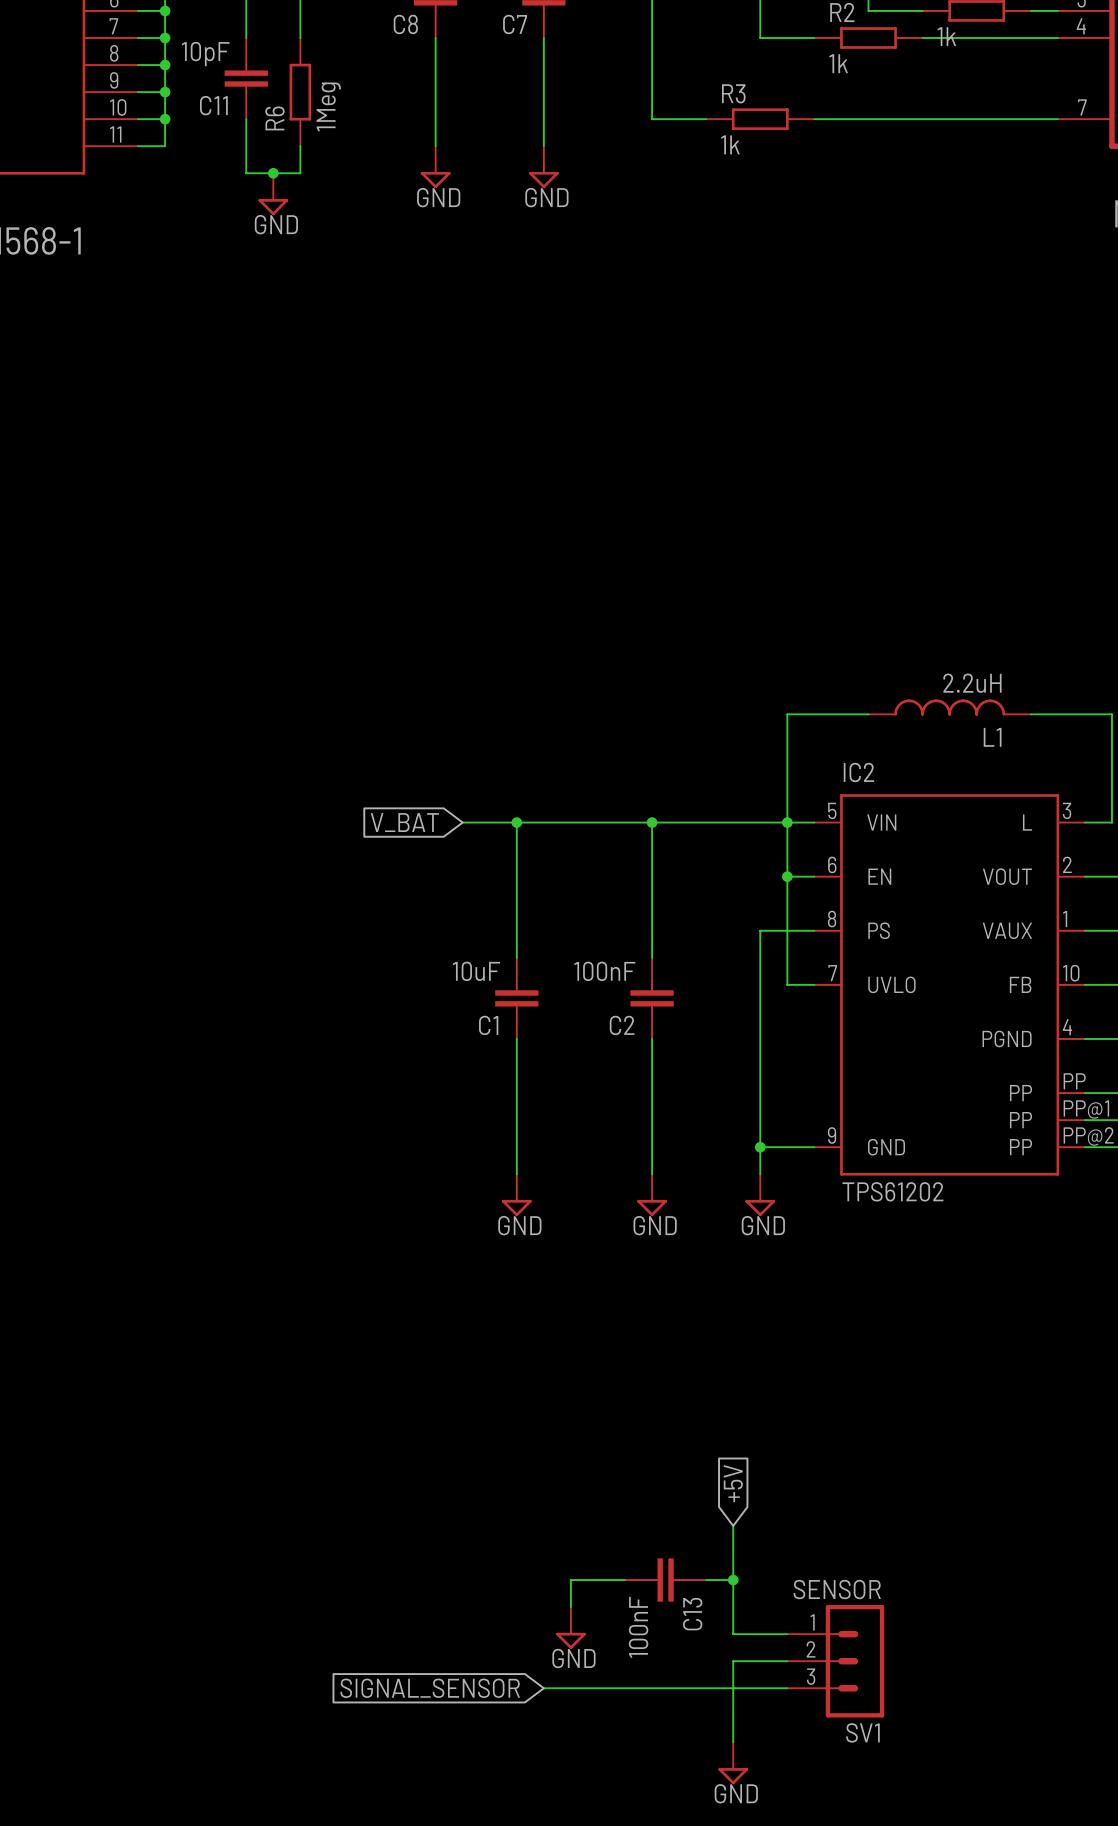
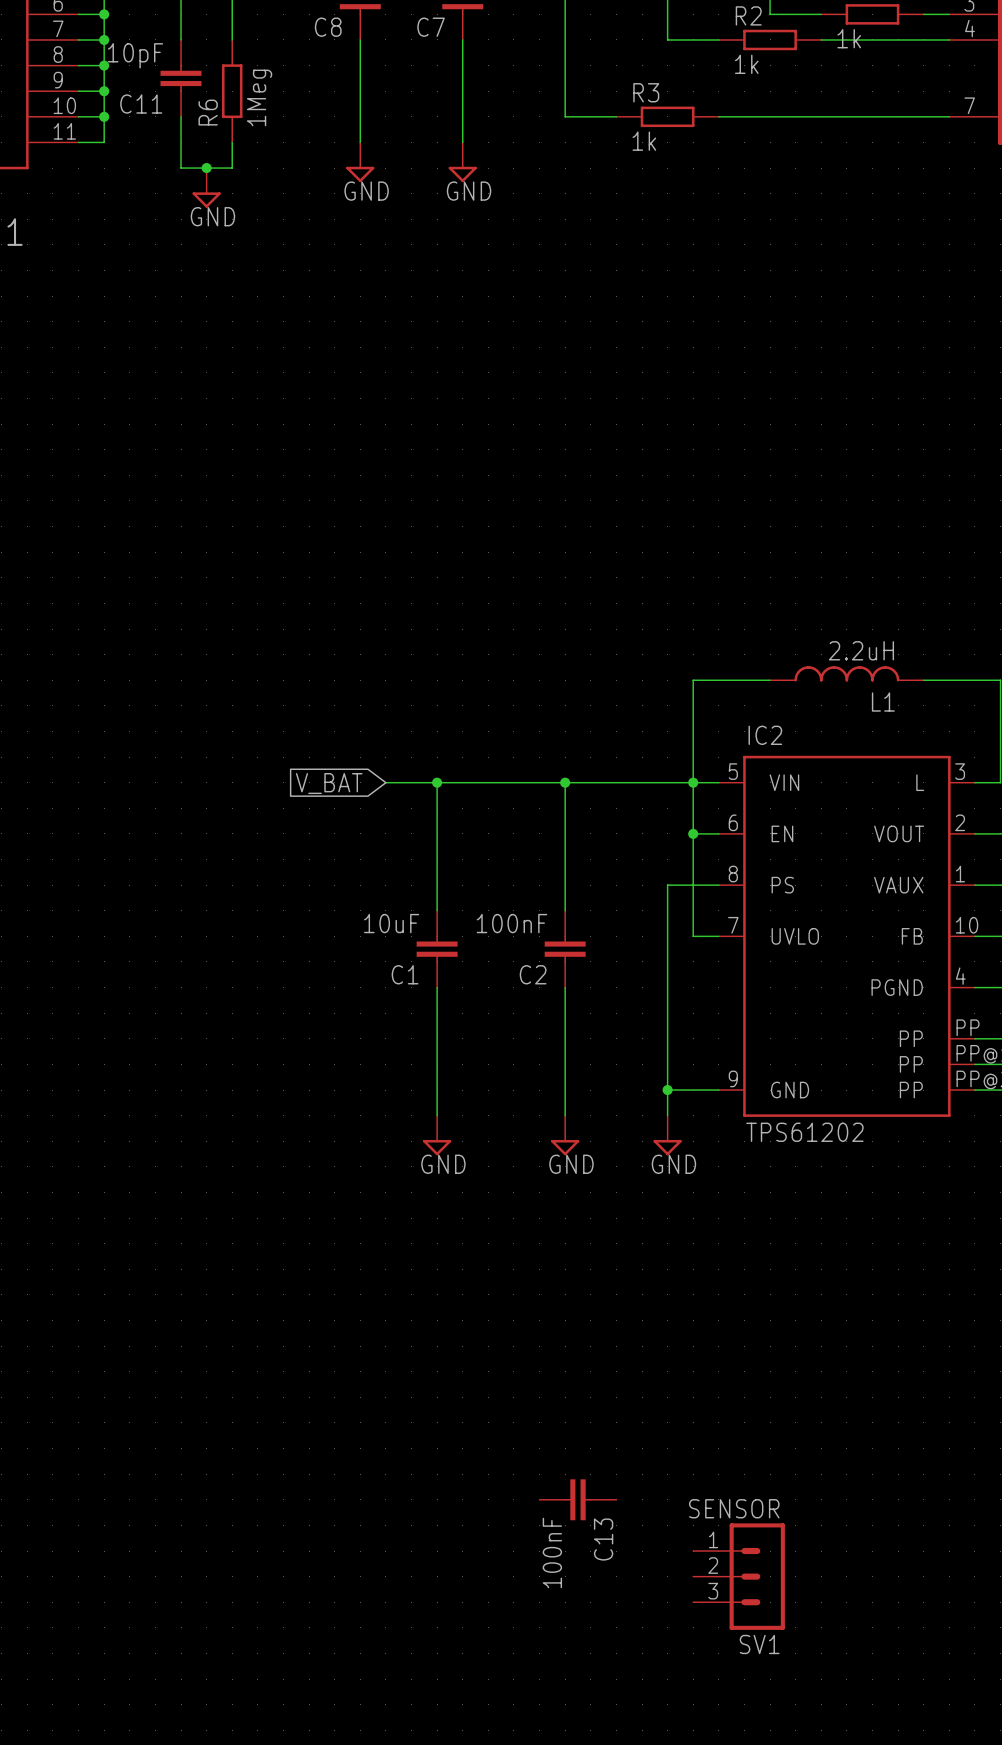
global label: +5V (733, 1483) -> none
wire: (733, 1525) (733, 1634) (787, 1634) -> none
wire: (625, 1580) (570, 1580) (570, 1607) -> none
wire: (706, 1580) (733, 1580) -> none
junction: (733, 1580) -> none
power symbol: GND (570, 1628) -> none
wire: (787, 1661) (733, 1661) (733, 1742) -> none
global label: SIGNAL_SENSOR (430, 1688) -> none
wire: (543, 1688) (787, 1688) -> none
power symbol: GND (733, 1763) -> none

